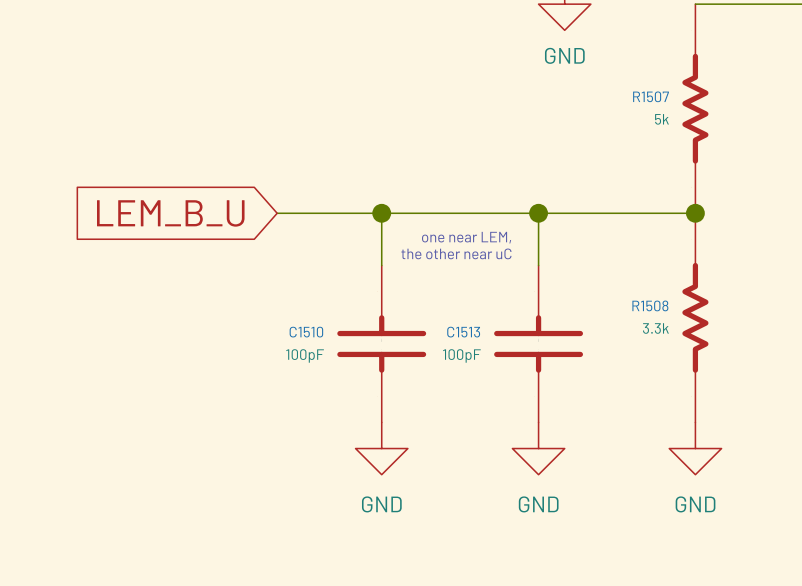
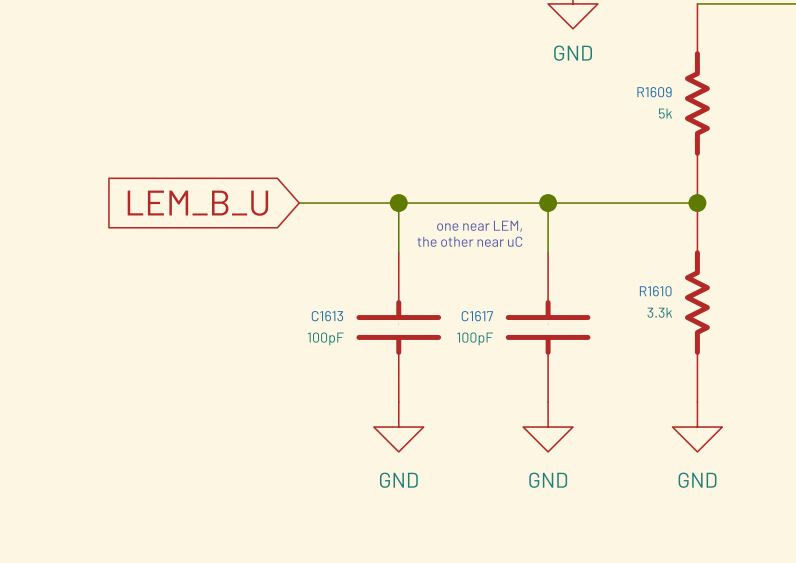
R1507 name: R1507 (651, 96) -> R1609 (654, 92)
R1508 name: R1508 (650, 305) -> R1610 (655, 291)
C1510 name: C1510 (306, 332) -> C1613 (327, 316)
C1513 name: C1513 (463, 332) -> C1617 (477, 316)

